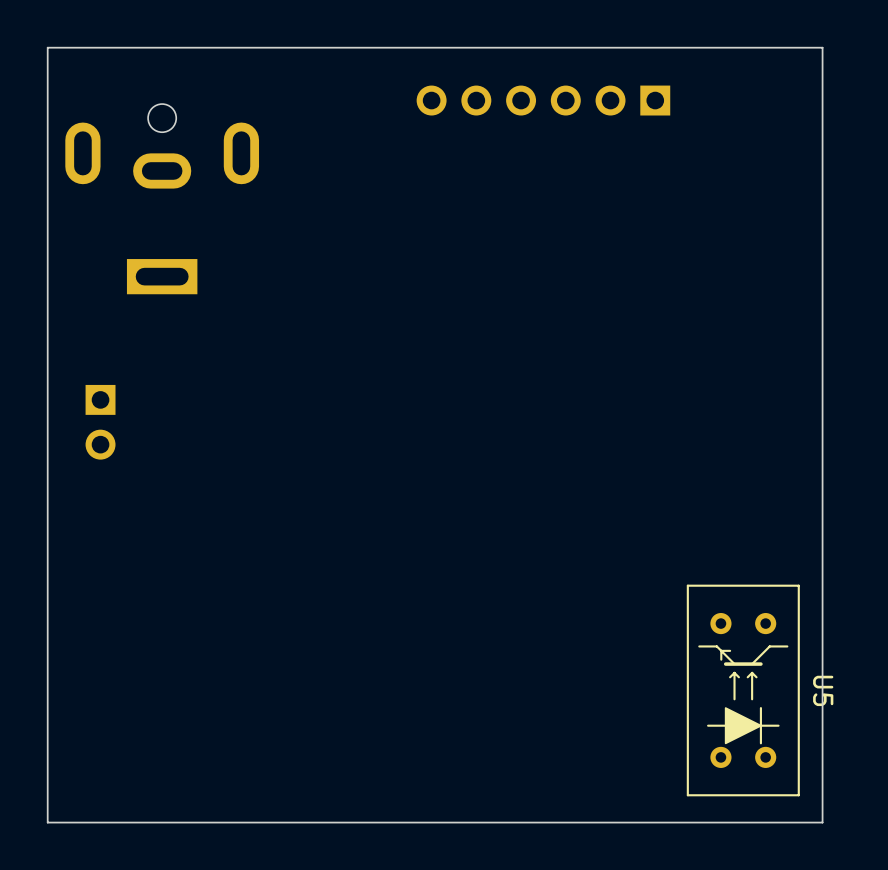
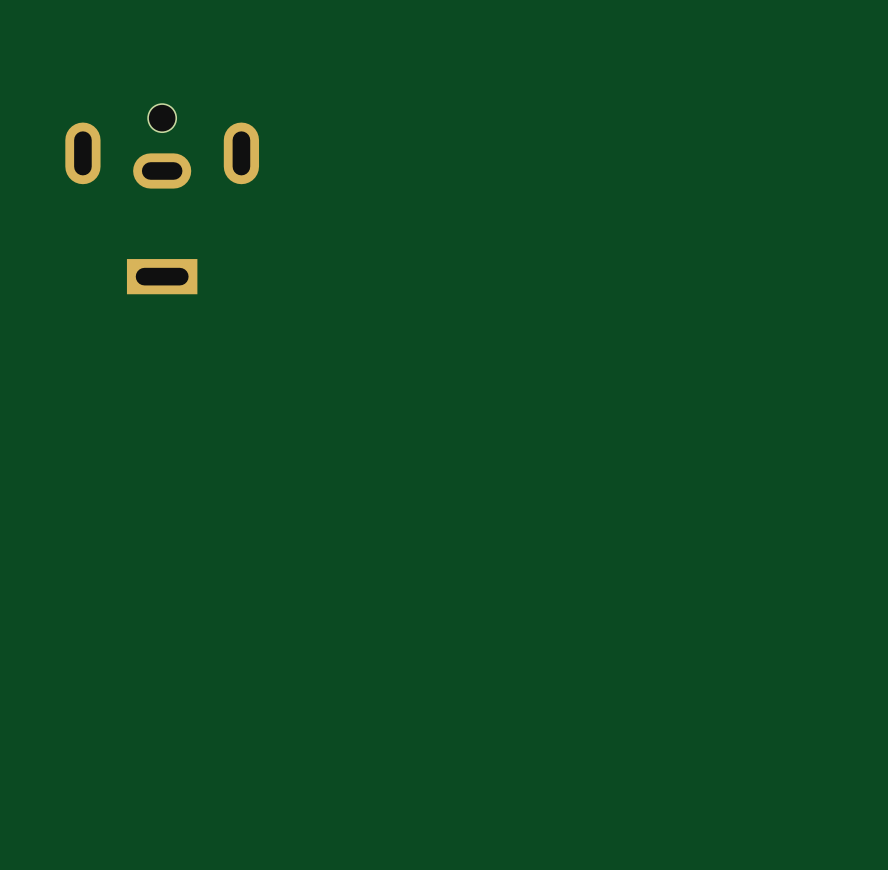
board edge: (822, 47) (47, 47) (47, 822) (822, 822) (822, 47) -> none
part: (543, 100) -> none
part: (100, 422) -> none
U5: (743, 690) -> none

